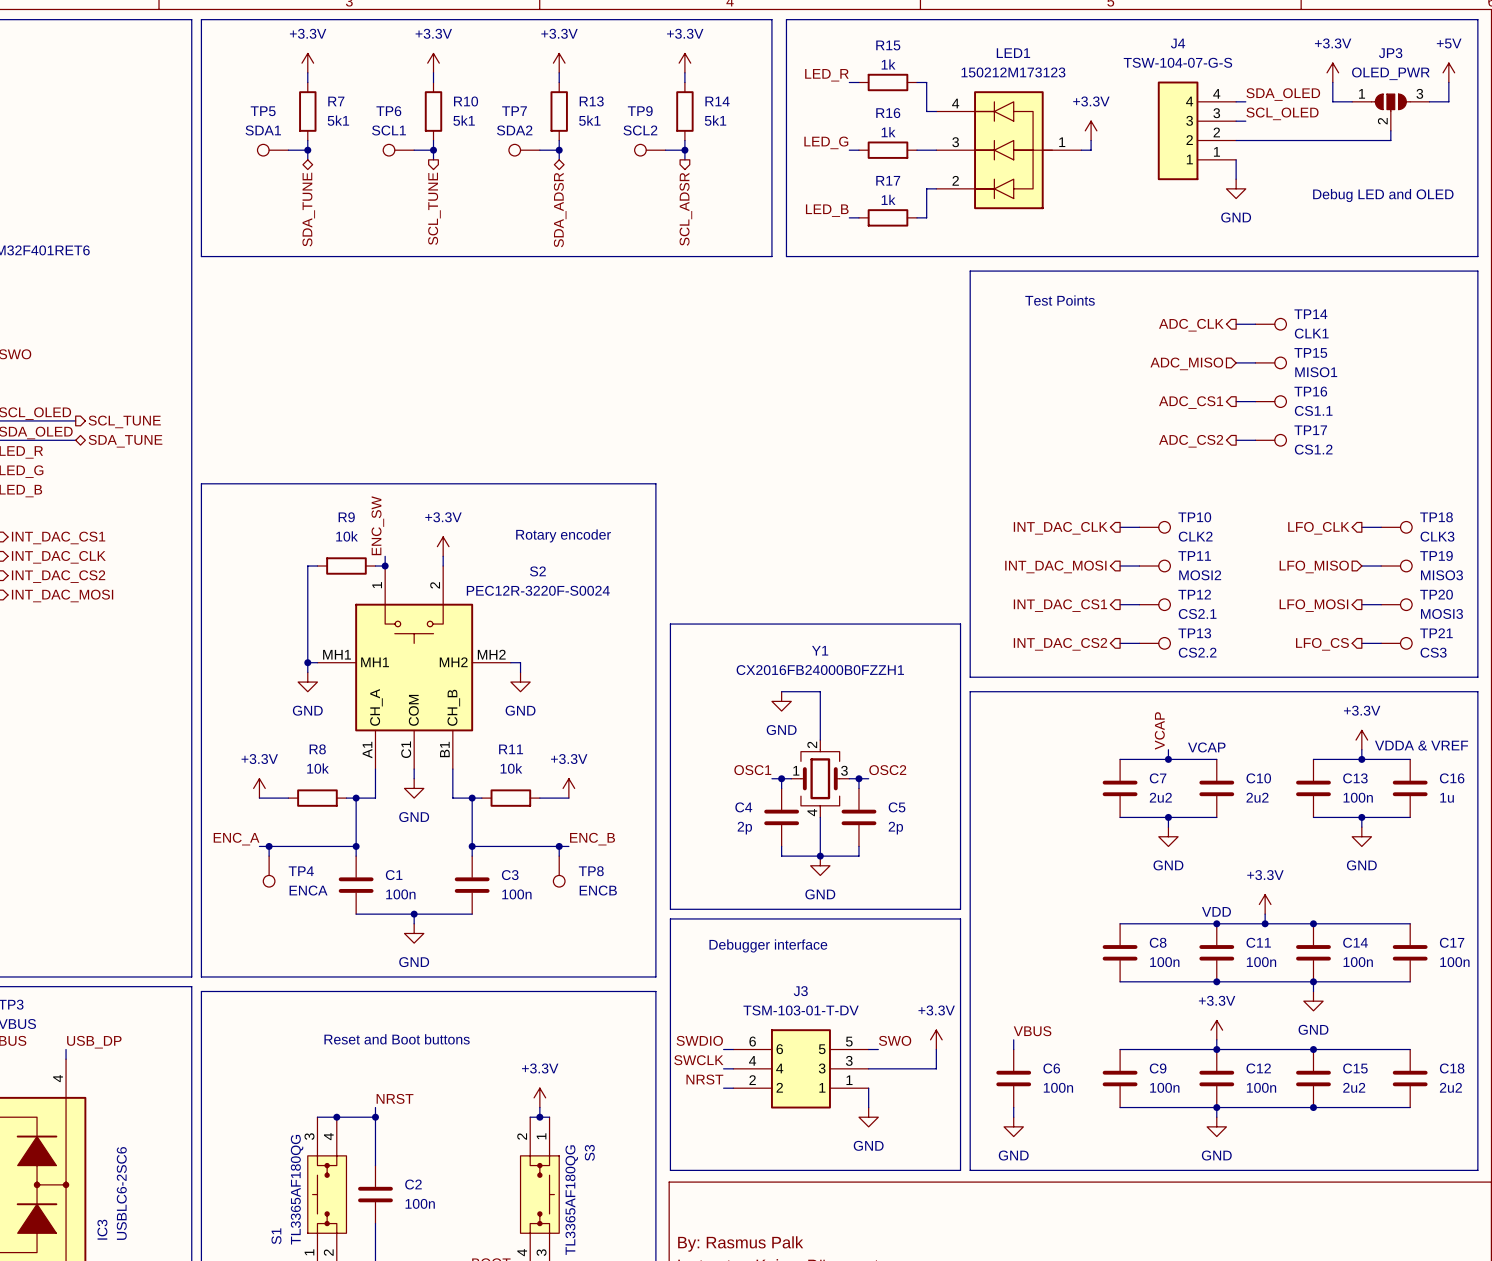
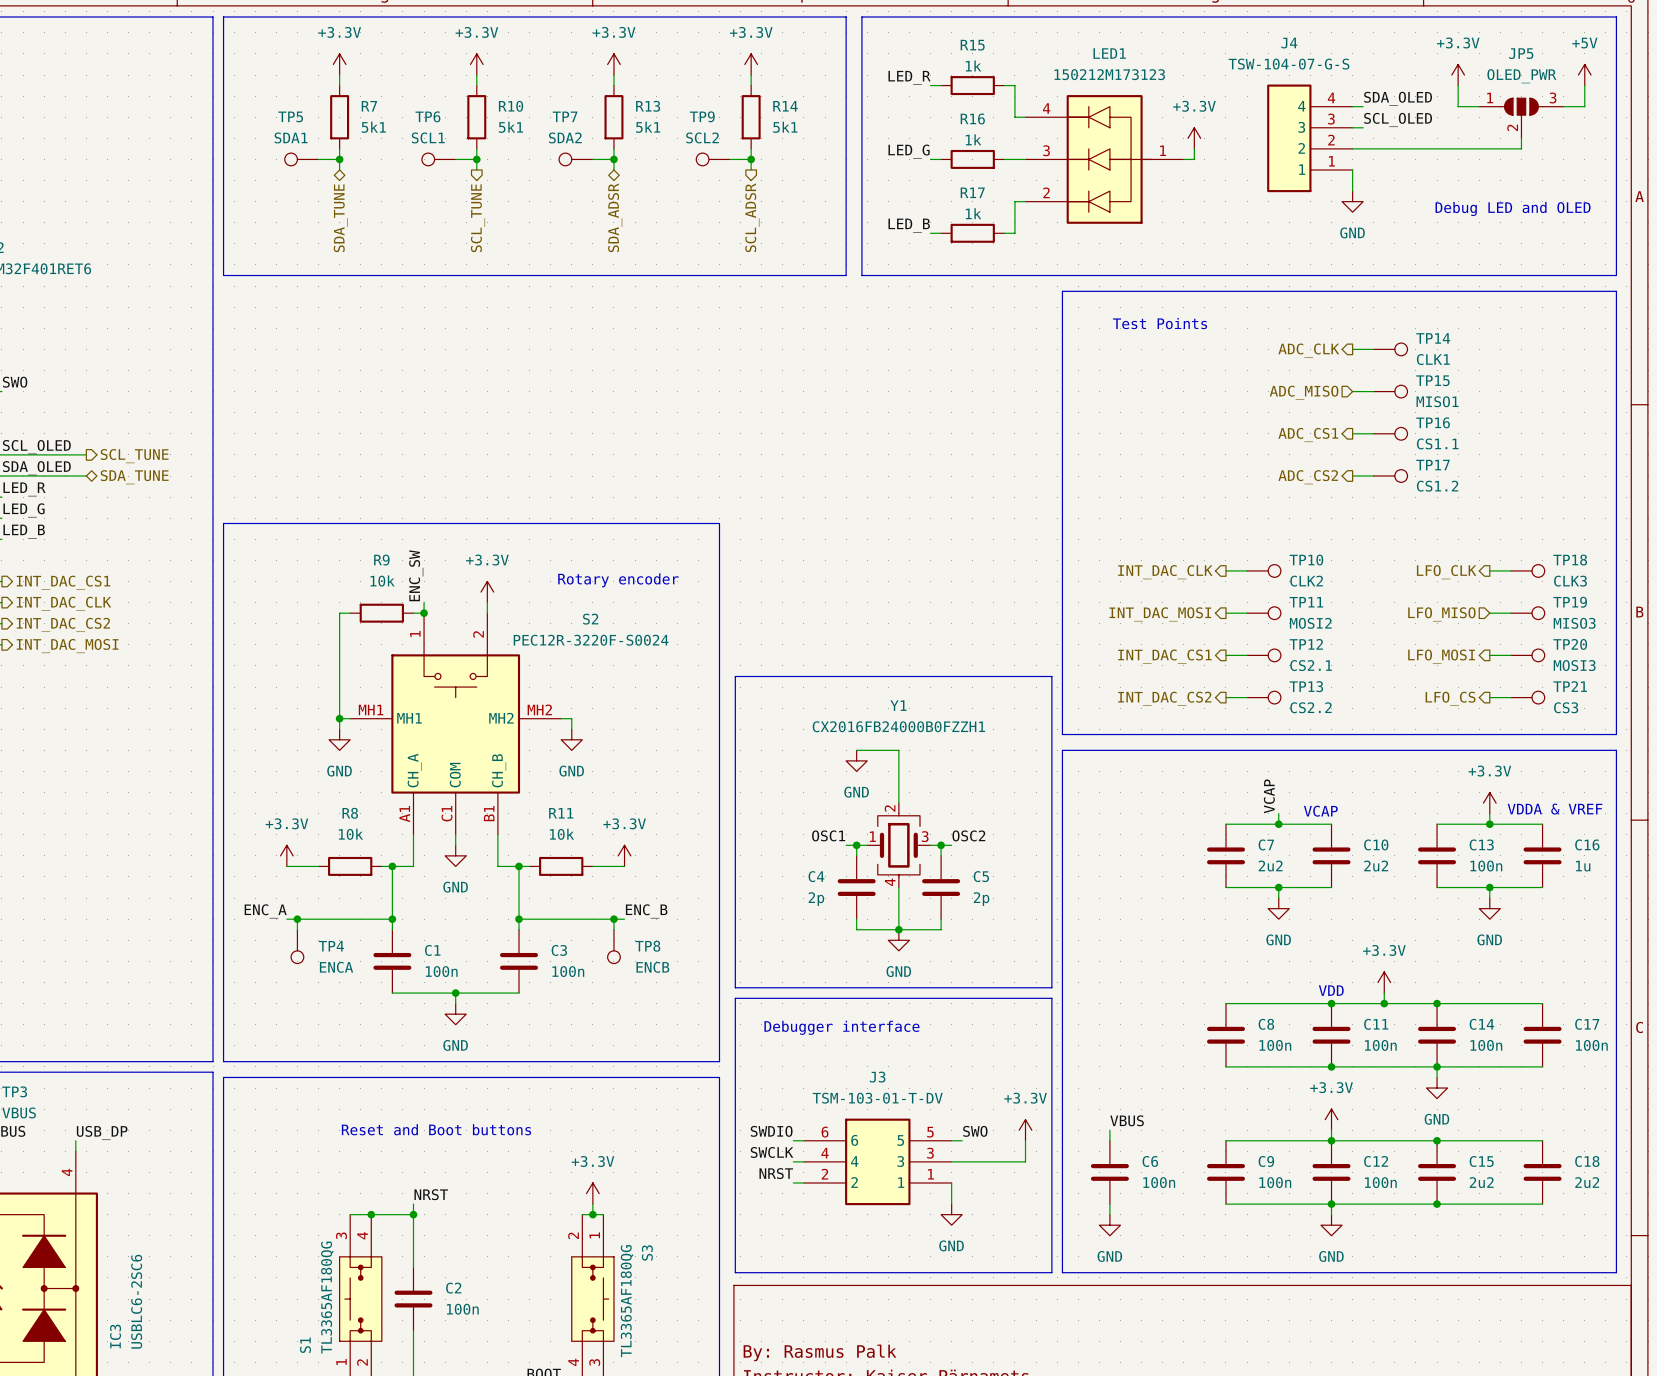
JP3 name: JP3 (1390, 53) -> JP5 (1521, 53)

